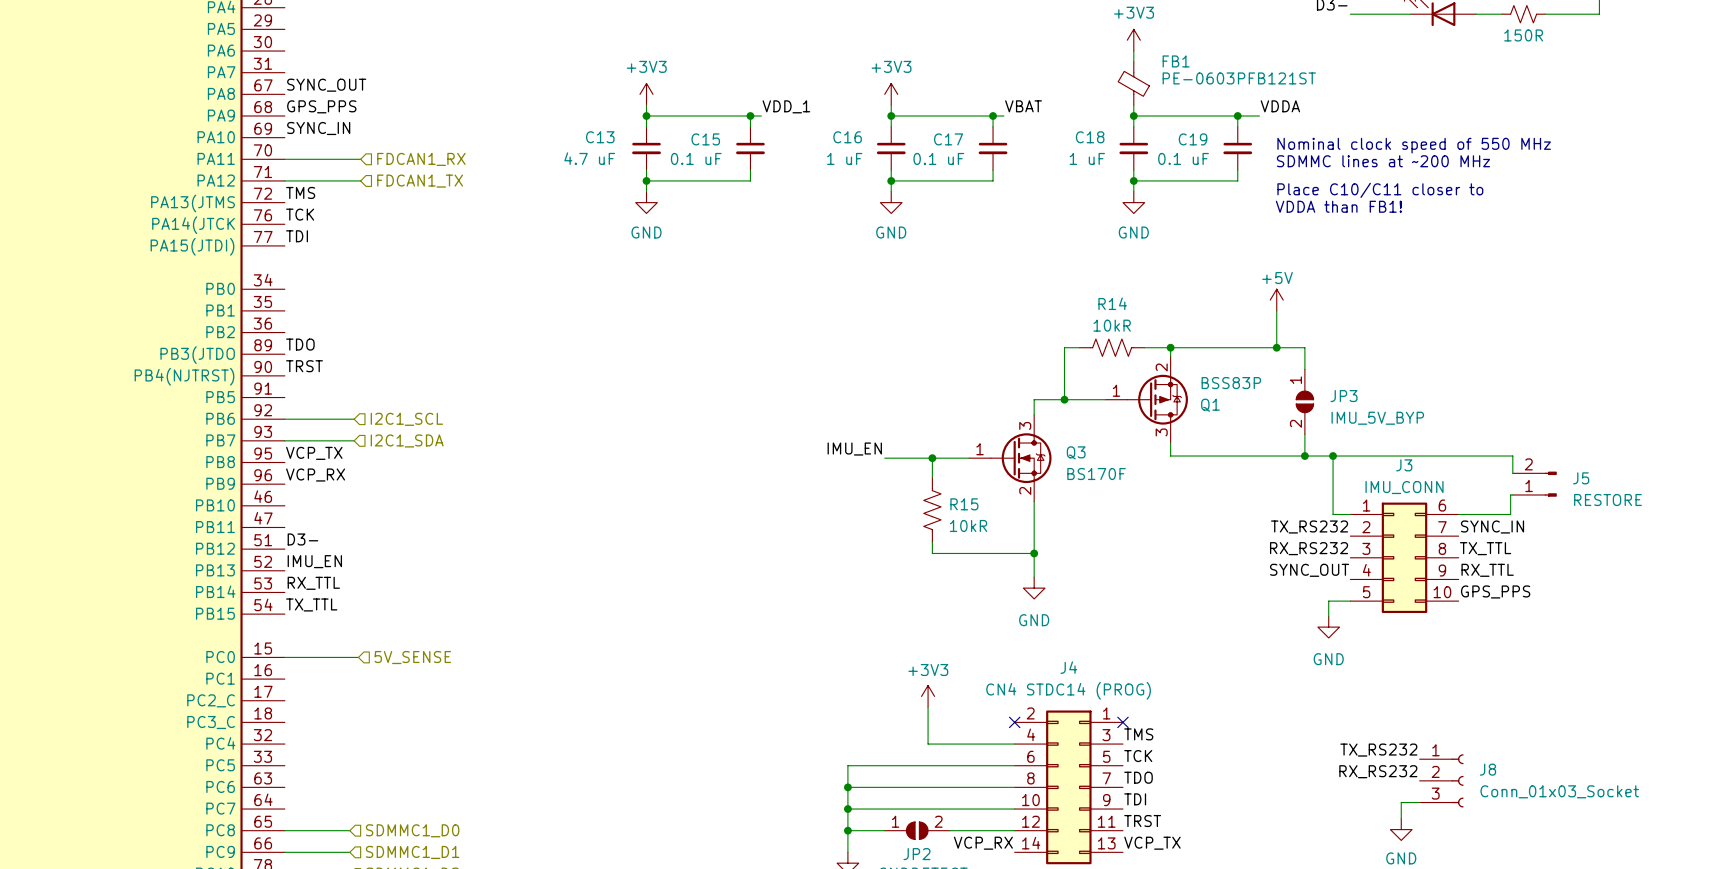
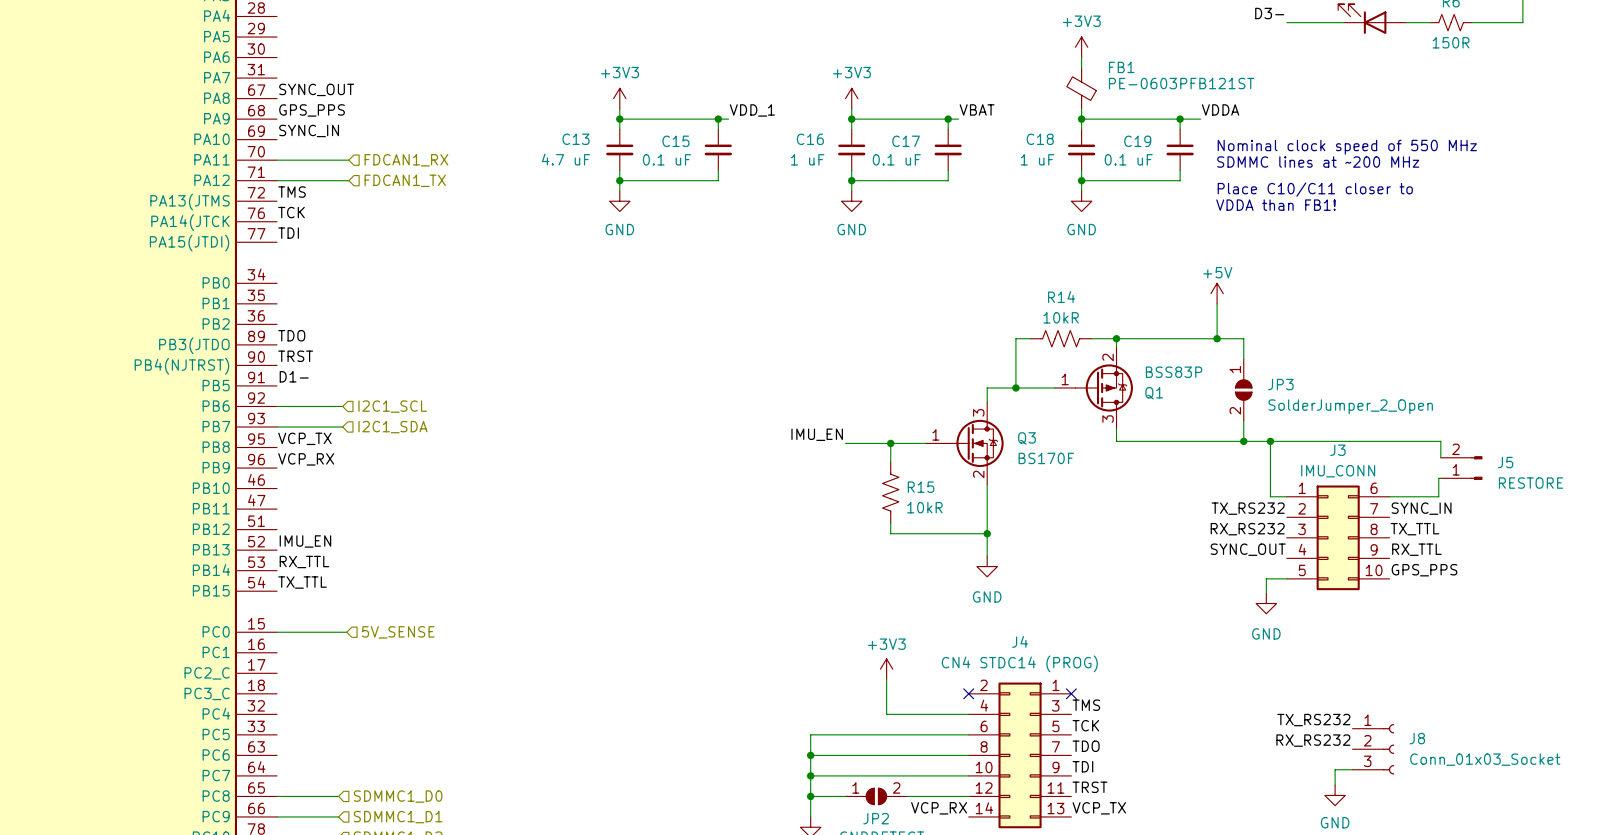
label: none -> D1- (294, 376)
JP3 value: IMU_5V_BYP (1377, 418) -> SolderJumper_2_Open (1350, 406)
label: D3- (302, 539) -> none

